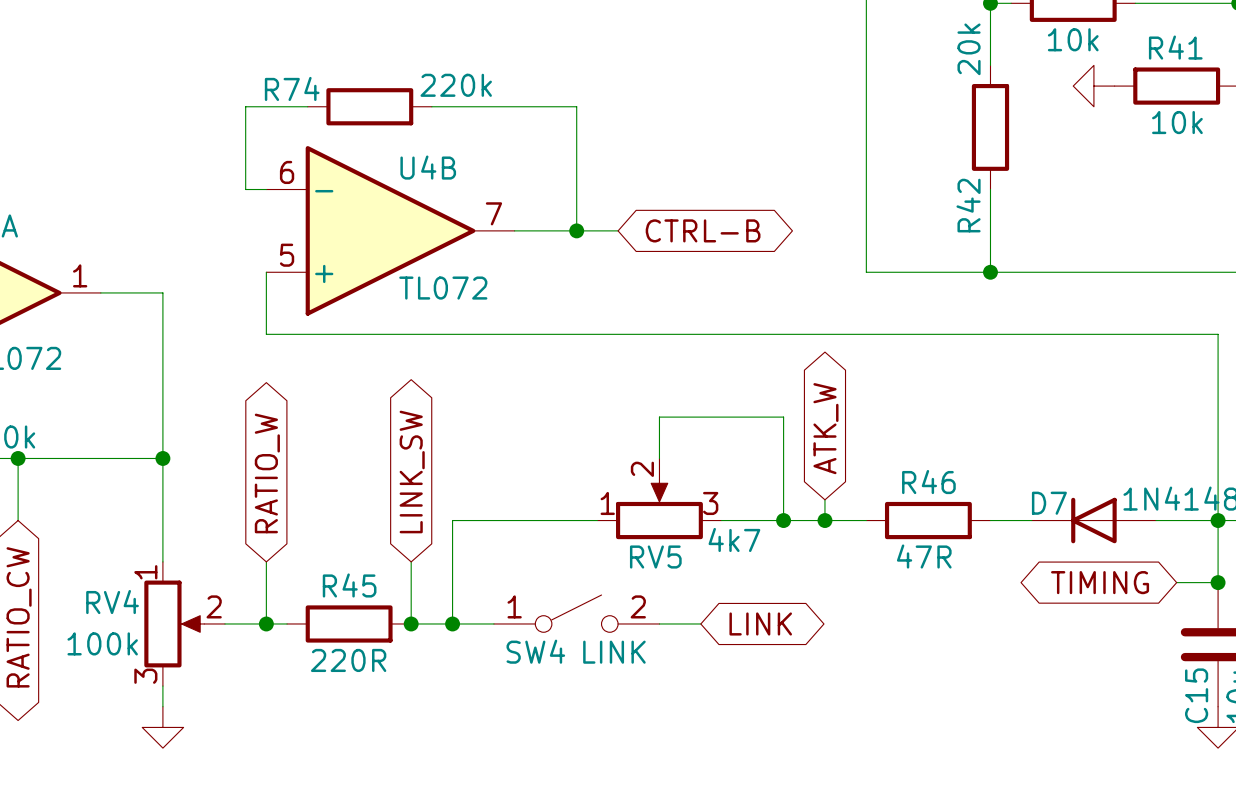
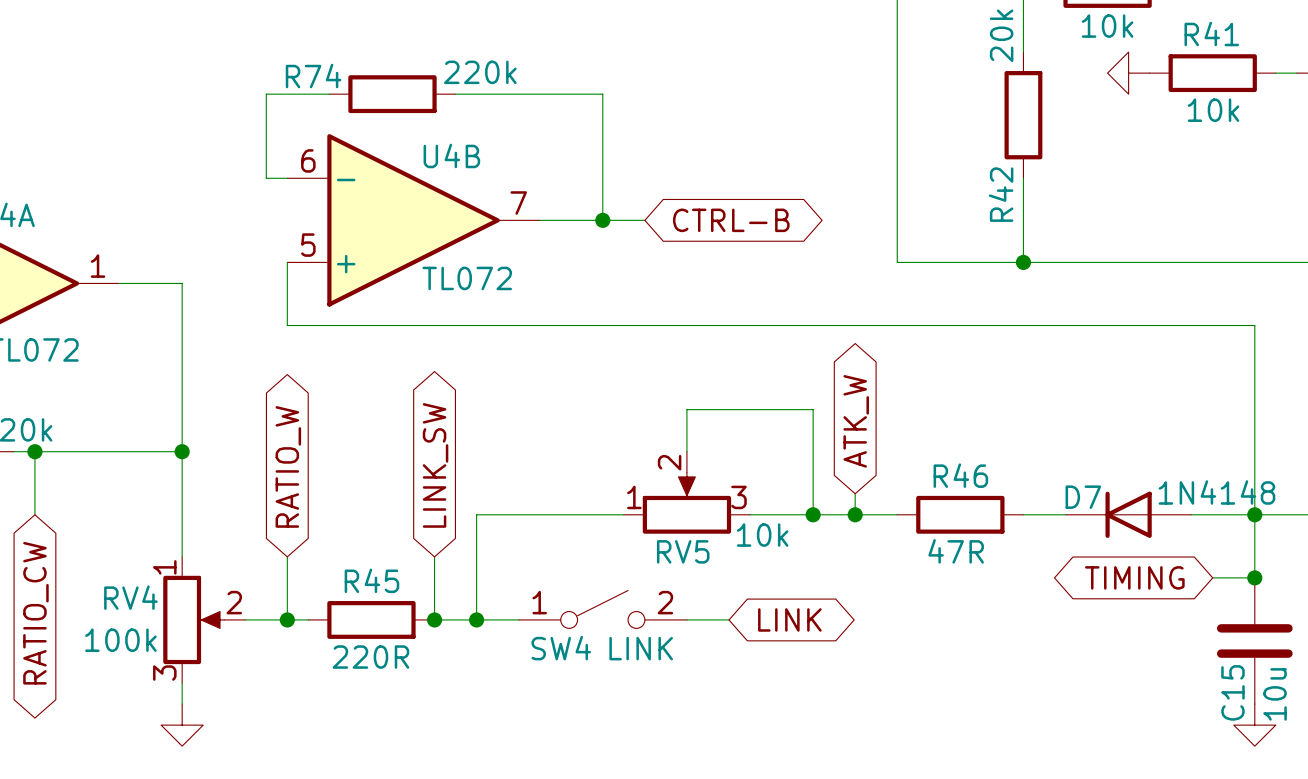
RV5 value: 4k7 (734, 539) -> 10k (762, 535)

